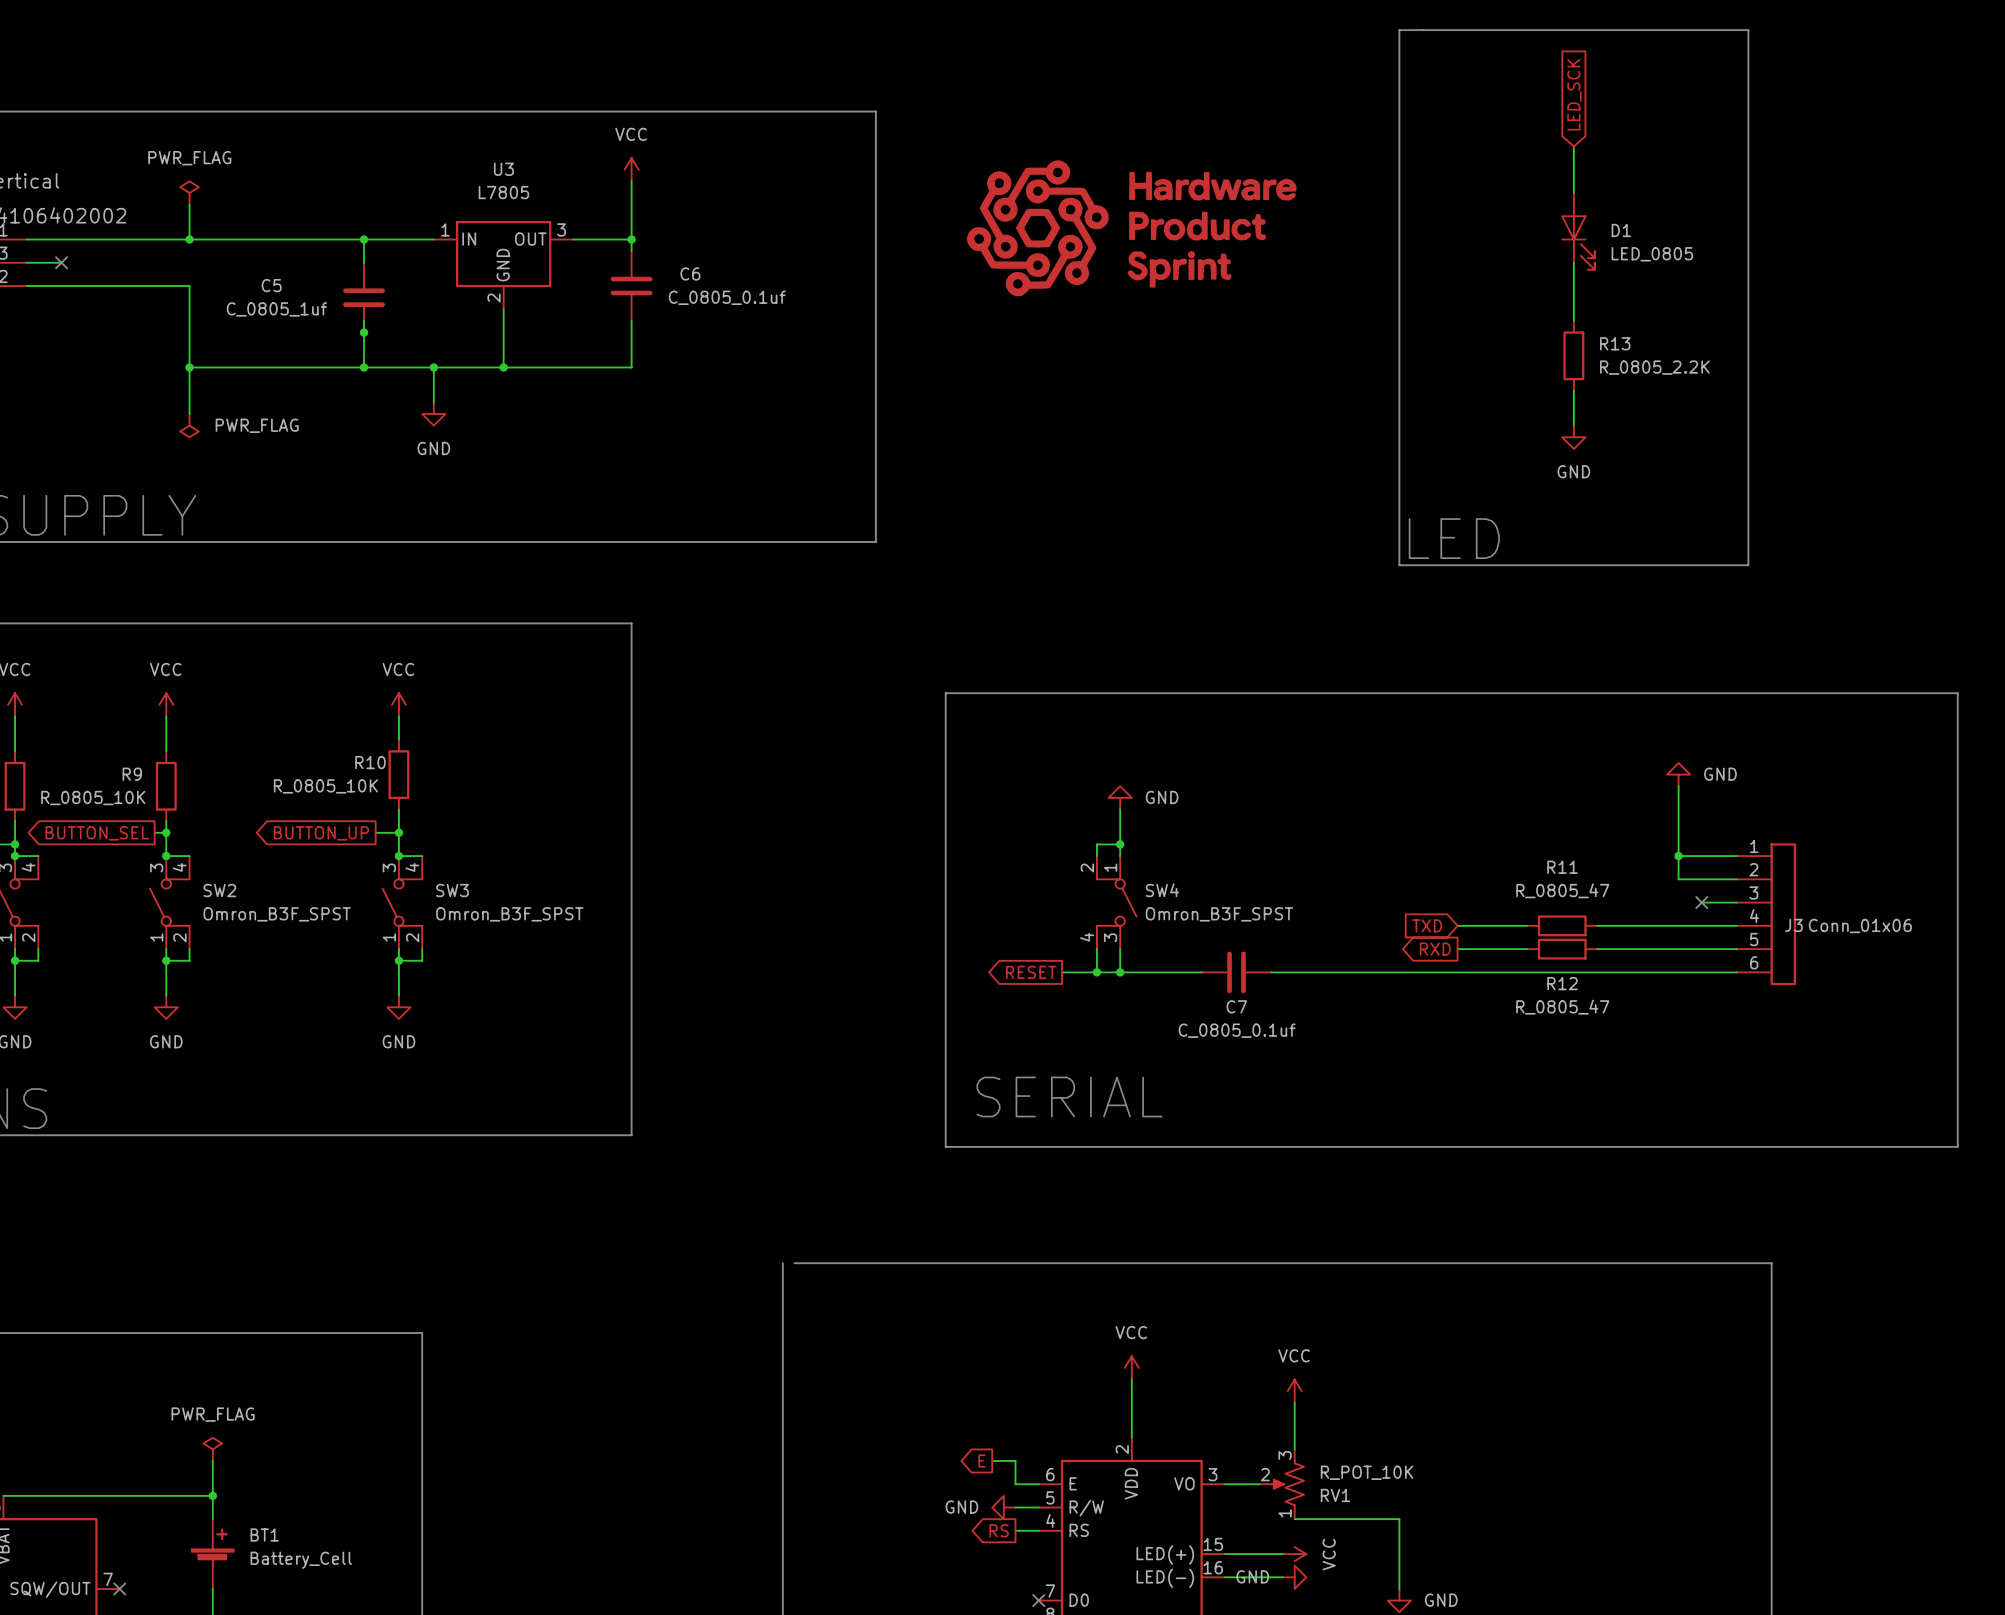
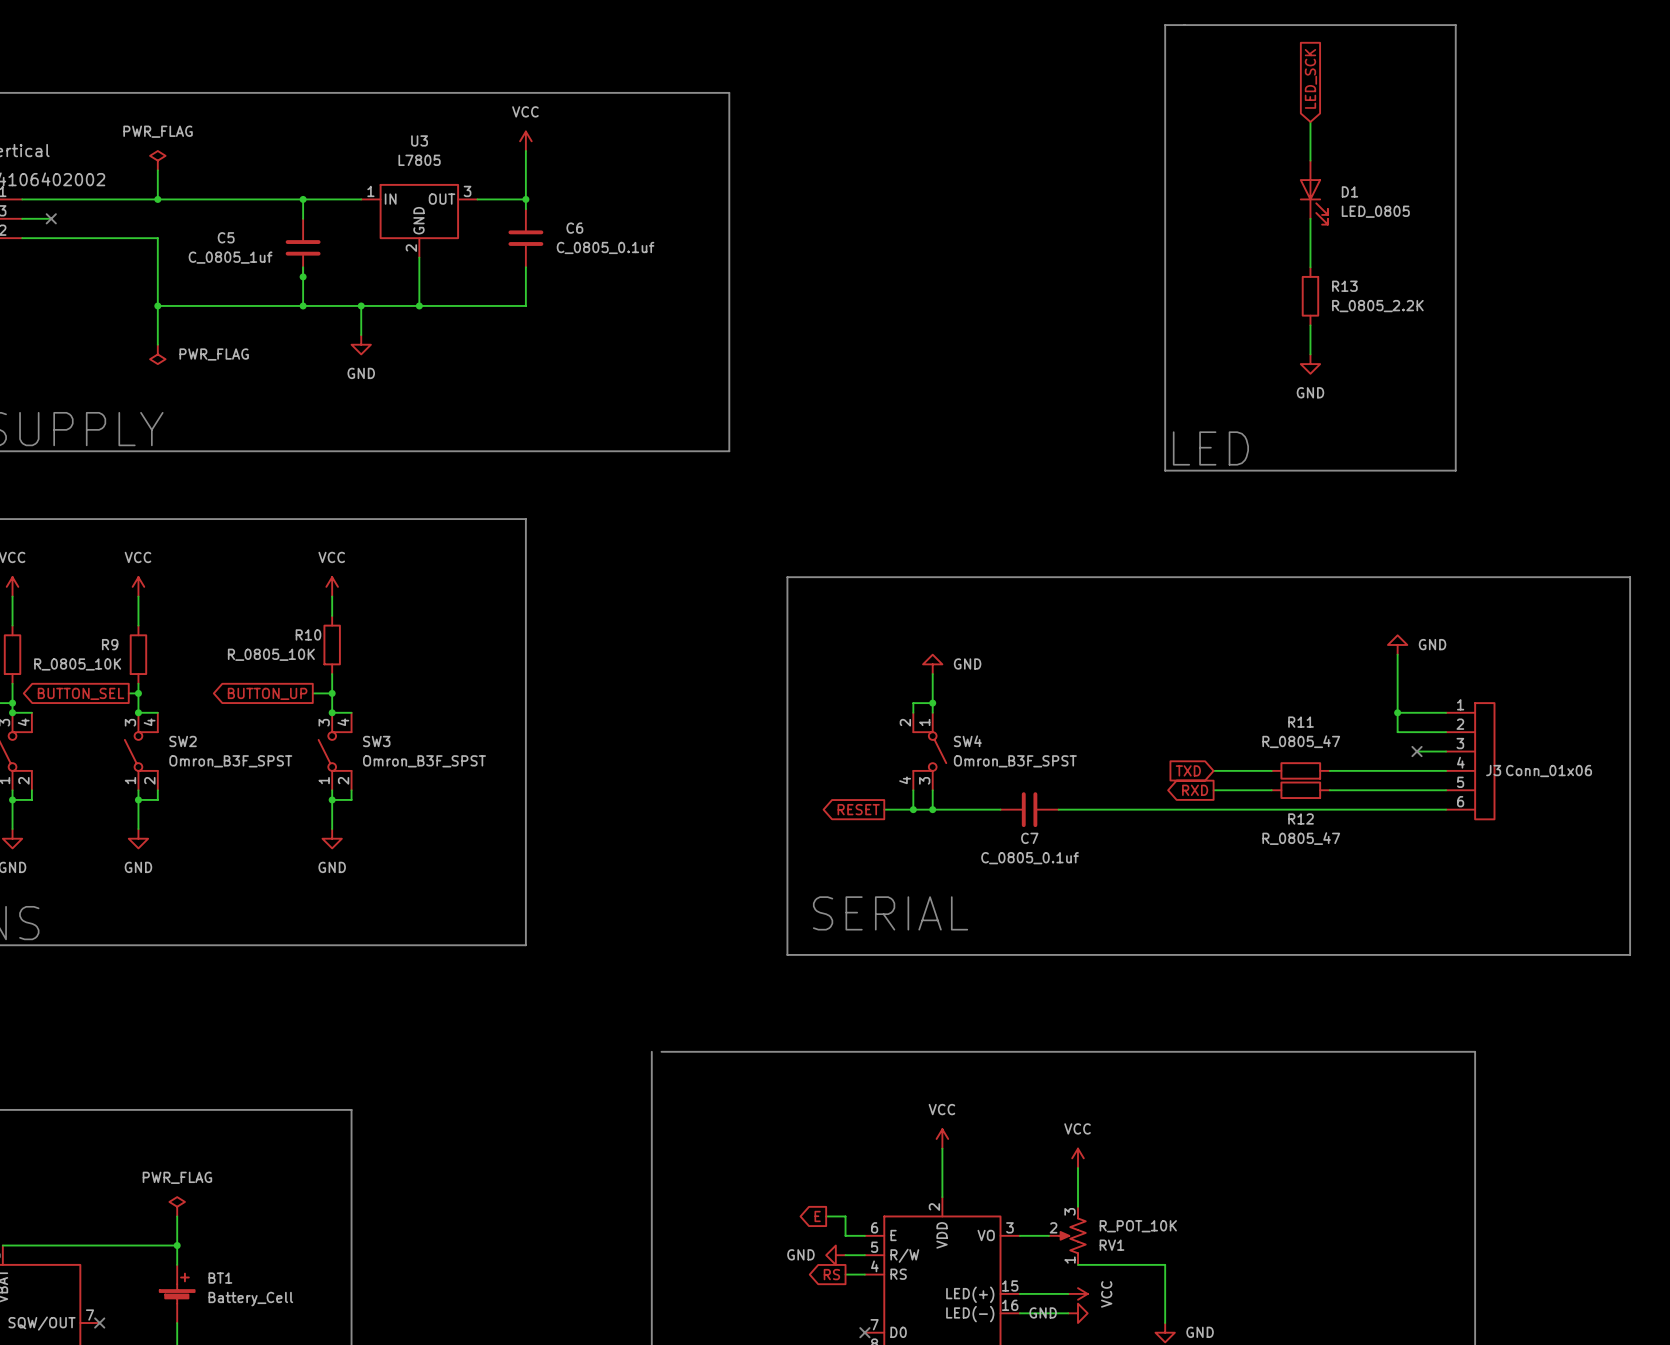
power symbol: (1131, 228) -> none

